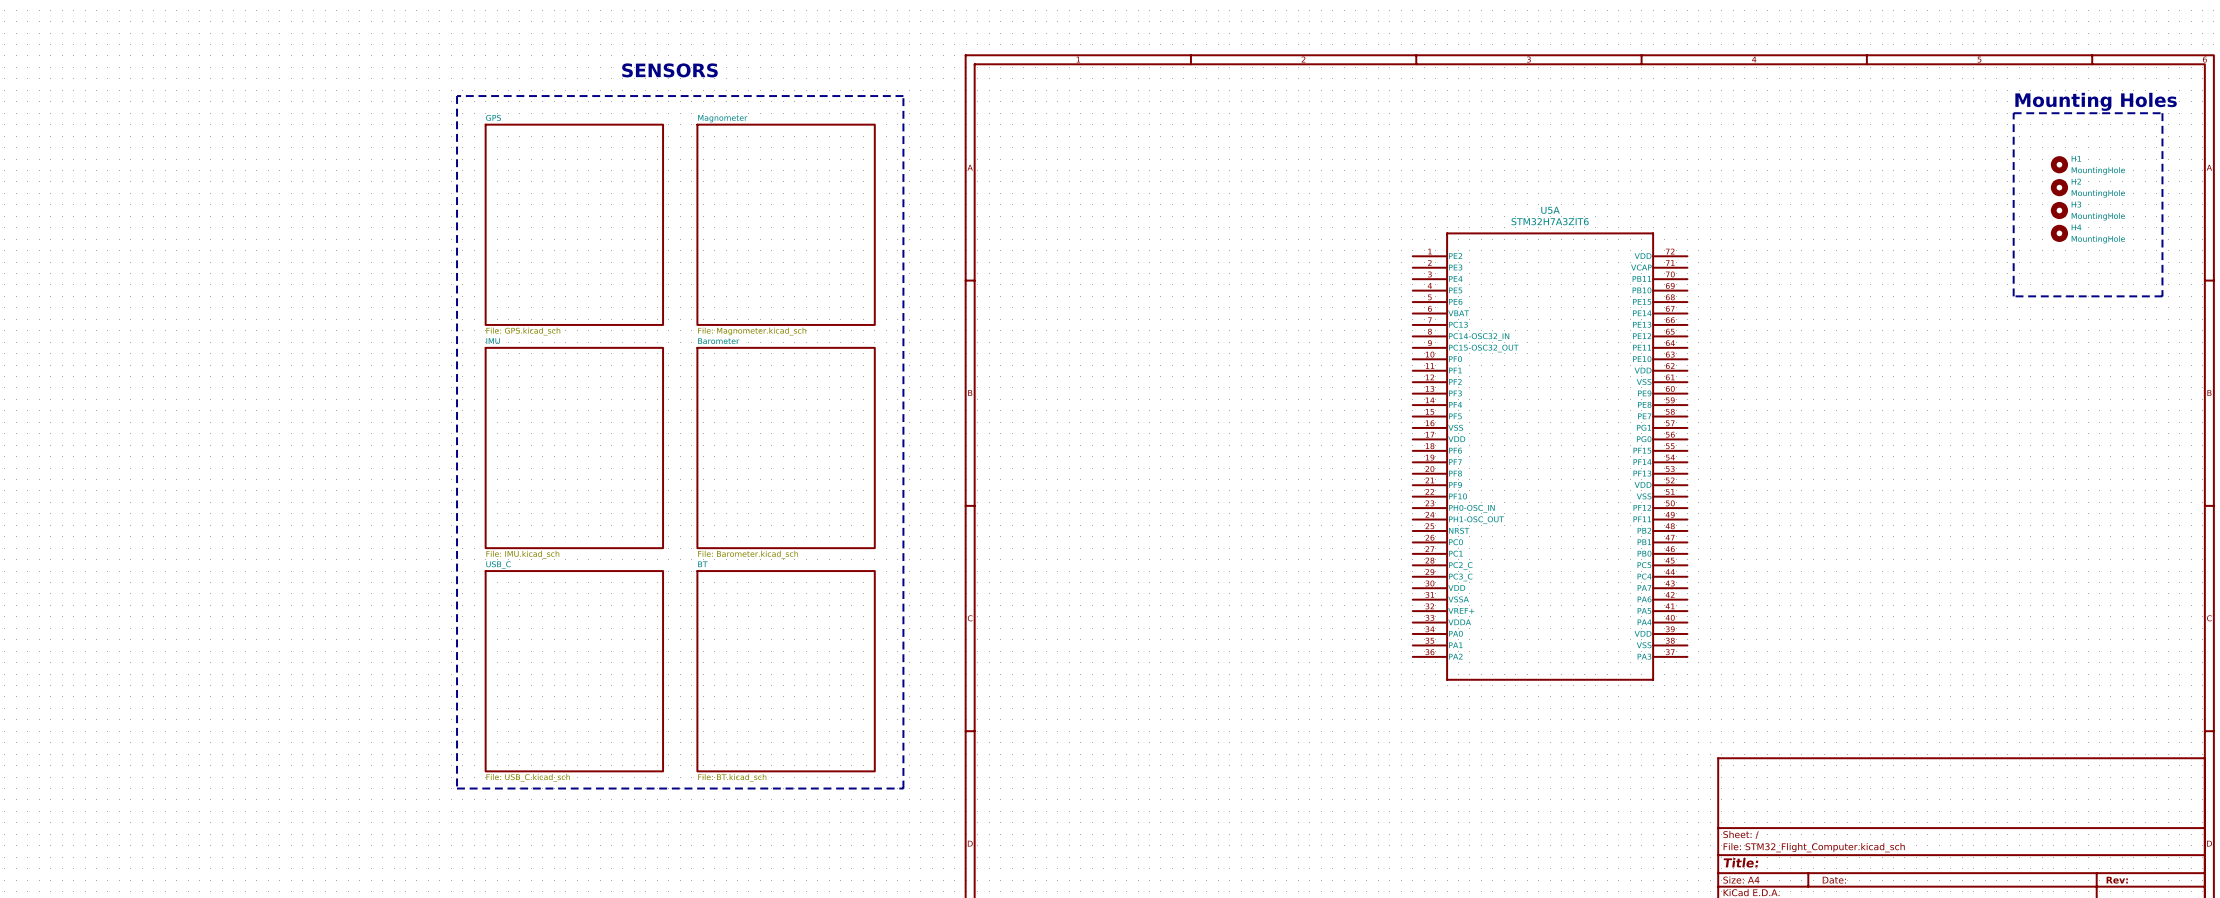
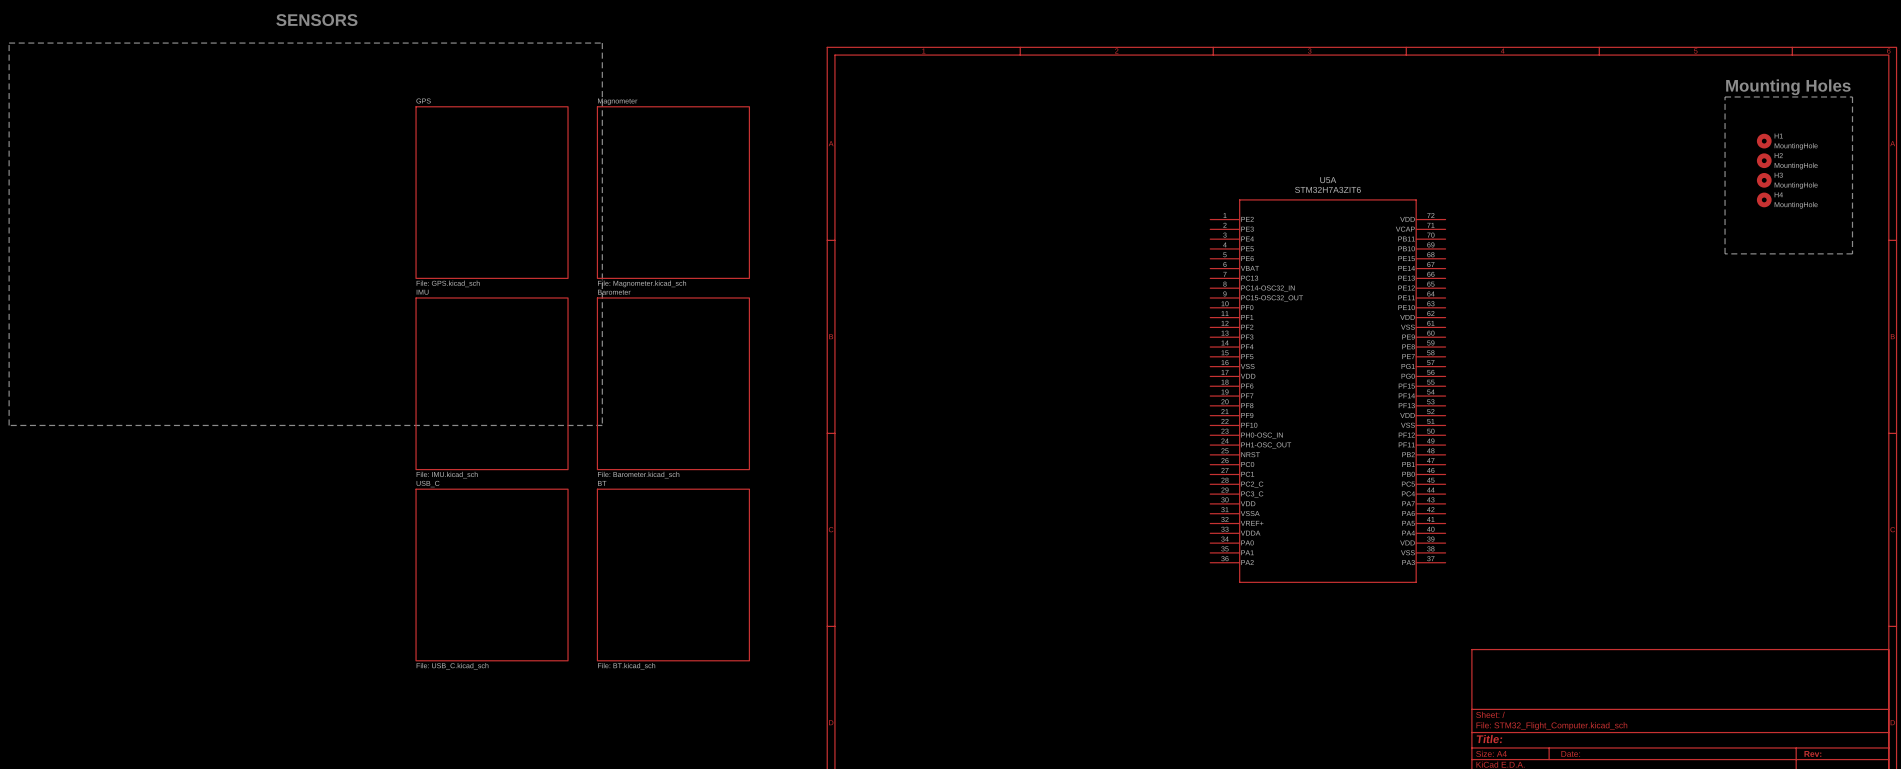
text: none -> SENSORS (316, 20)
line: none -> (9, 43) (602, 43) (602, 425) (9, 425) (9, 43)
text: SENSORS (669, 70) -> none
line: (457, 96) (903, 96) (903, 788) (457, 788) (457, 96) -> none

